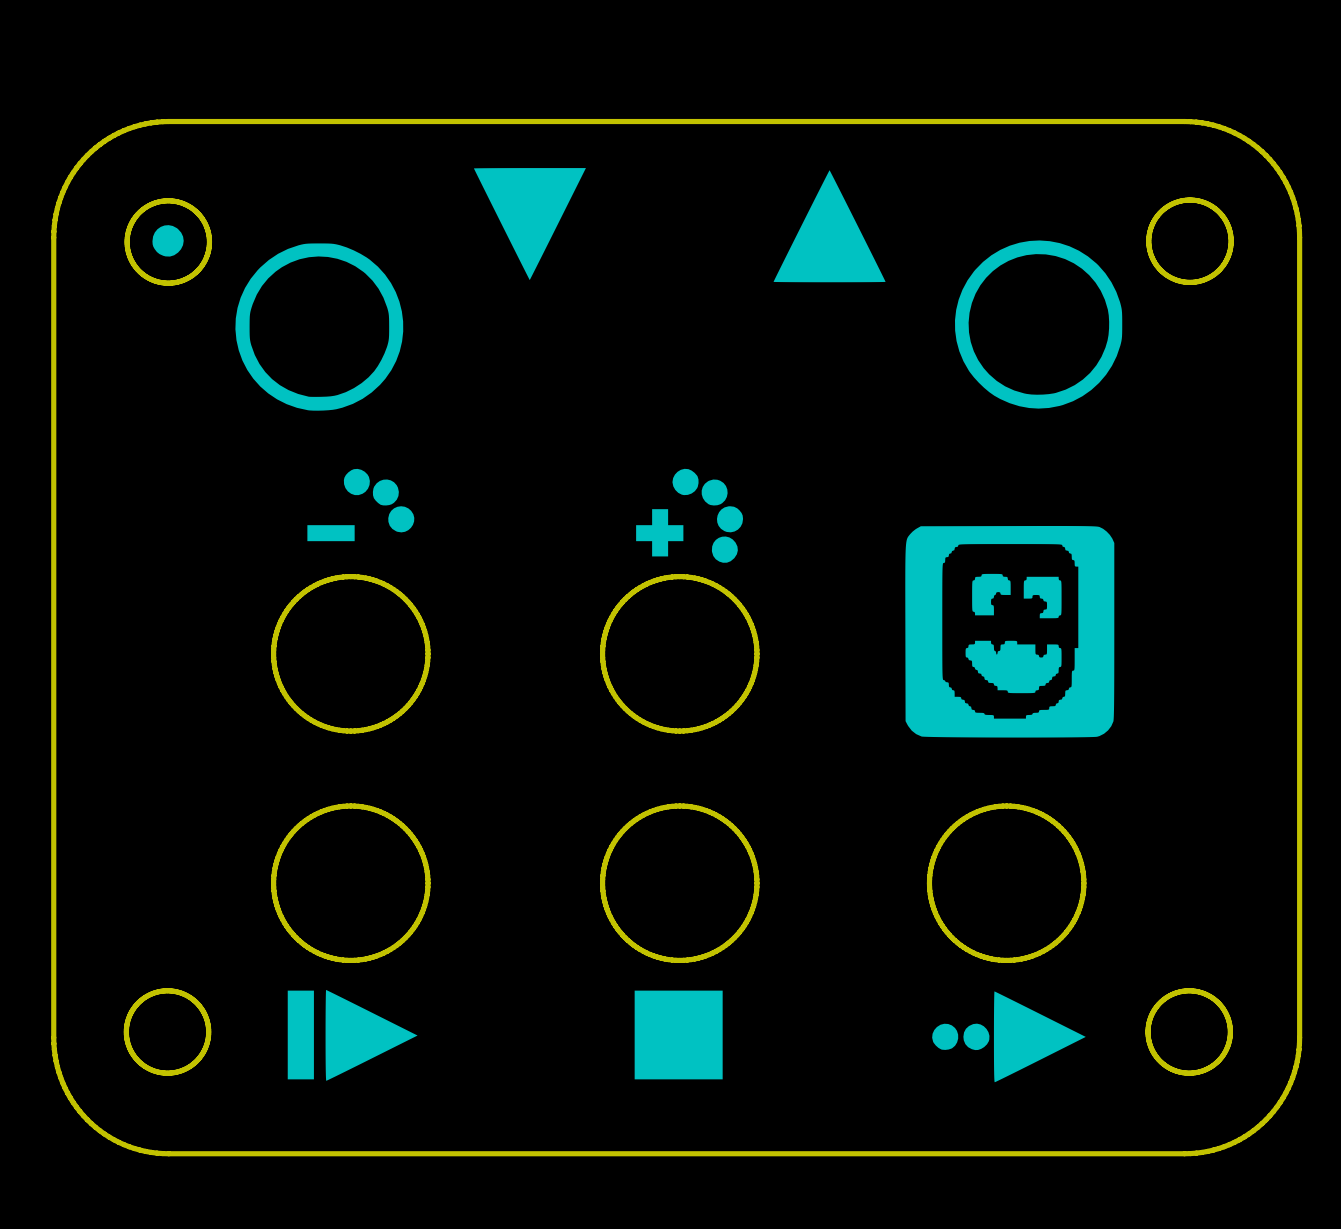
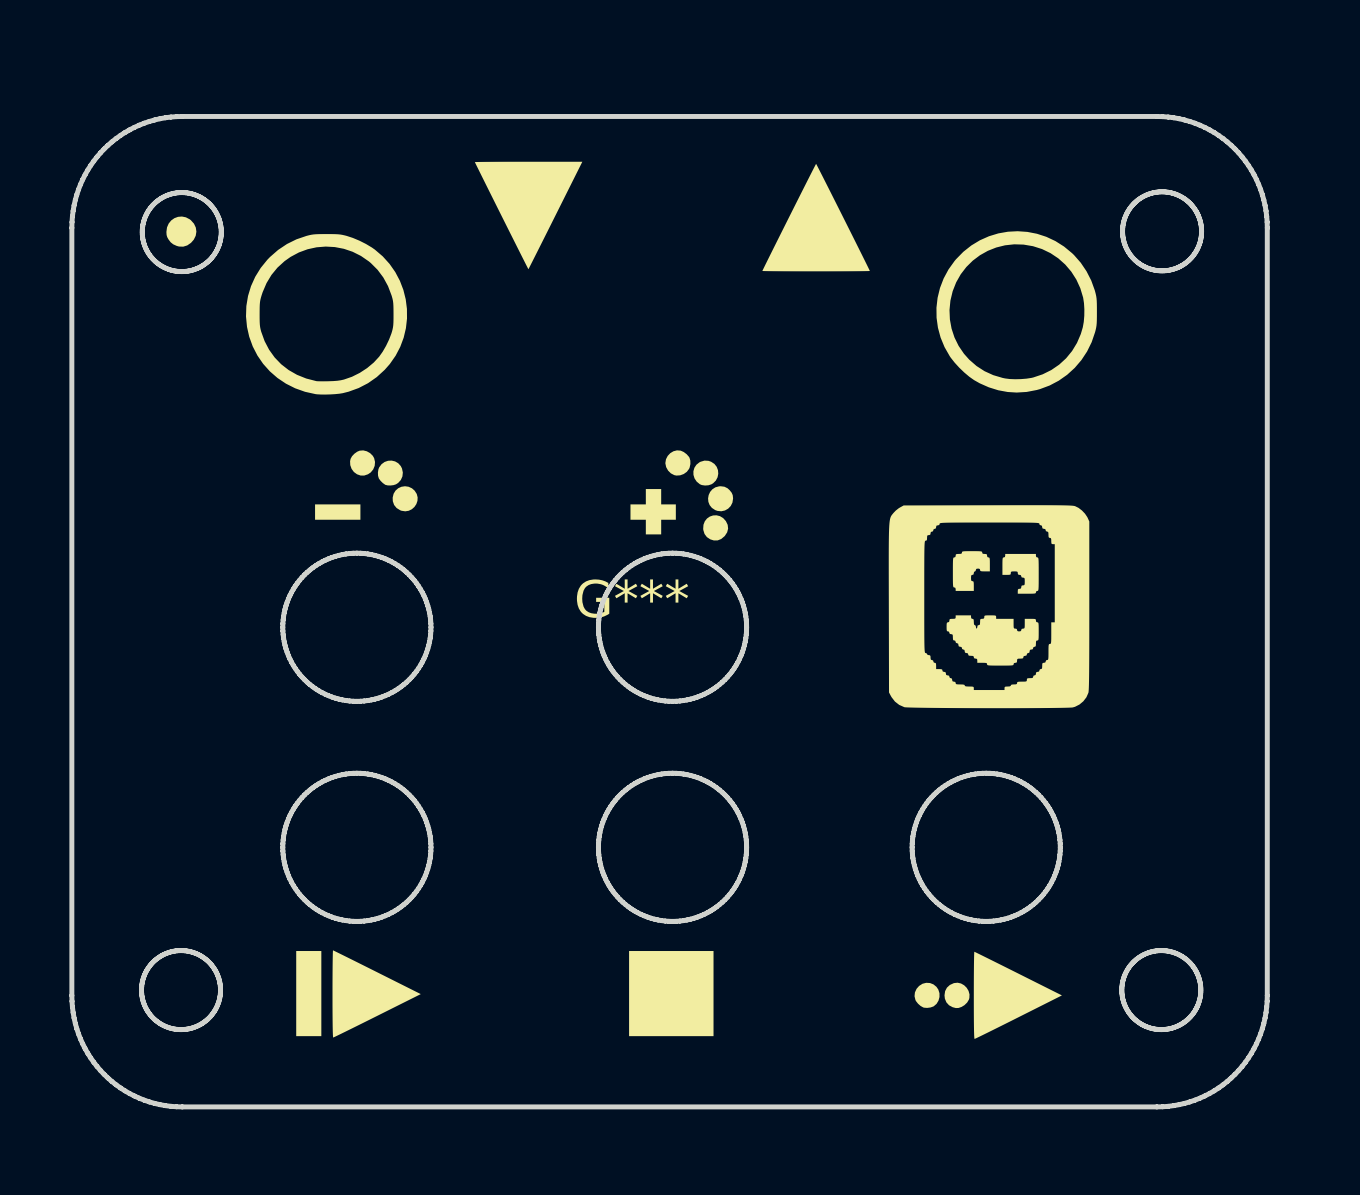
drawing: [152, 168, 1123, 1083] -> none
G***: none -> (631, 600)

